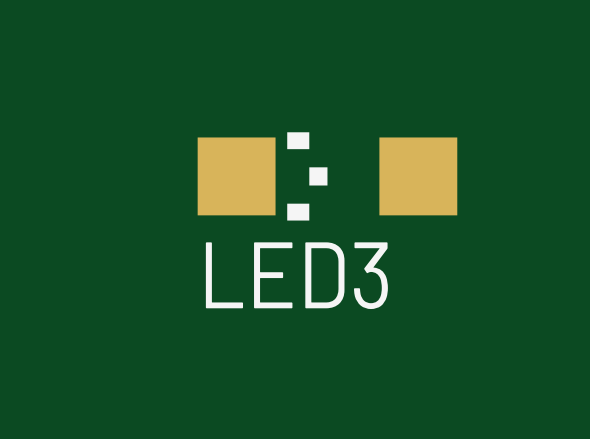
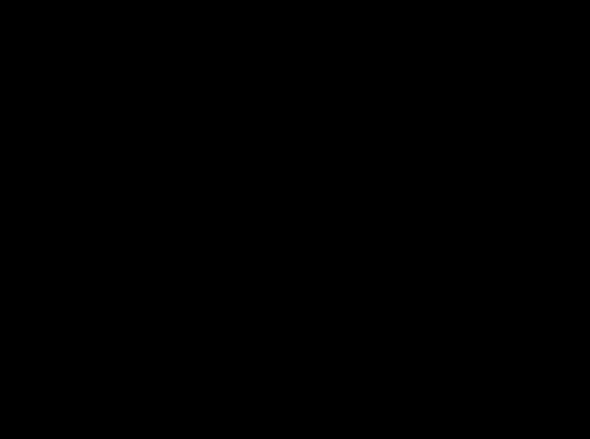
LED3: (327, 176) -> none

